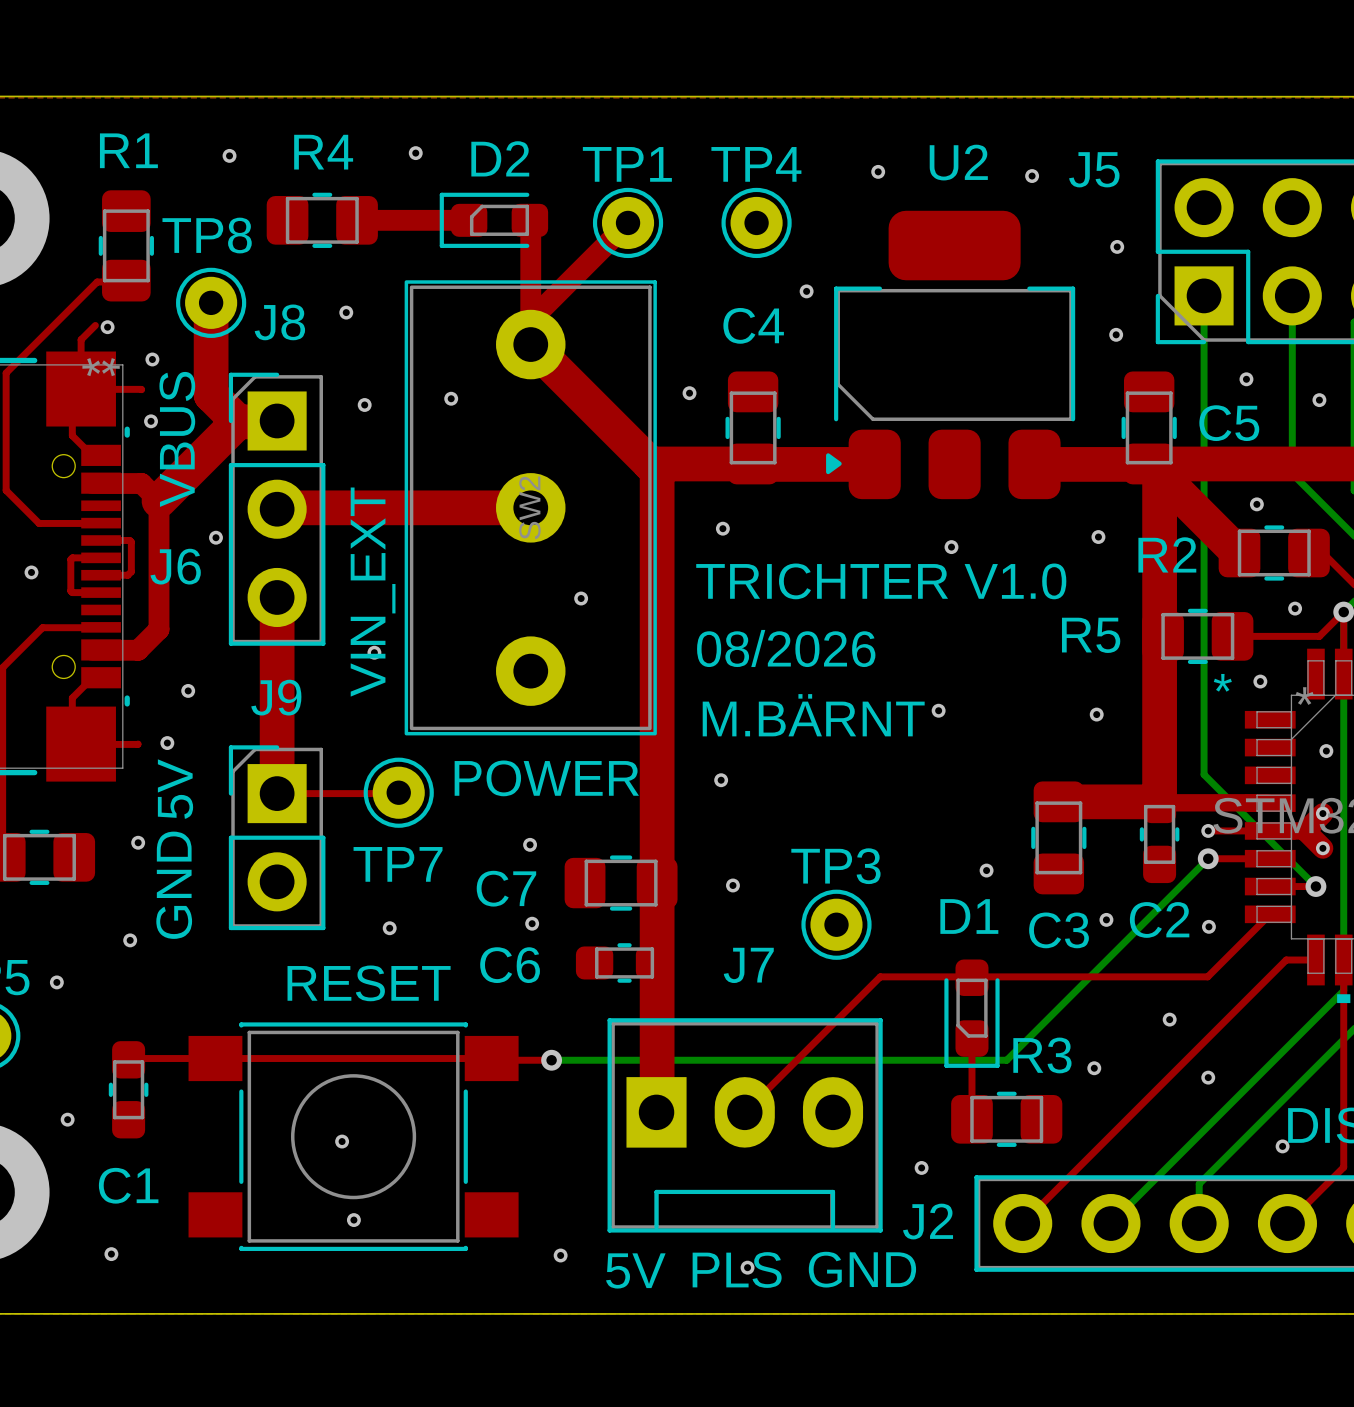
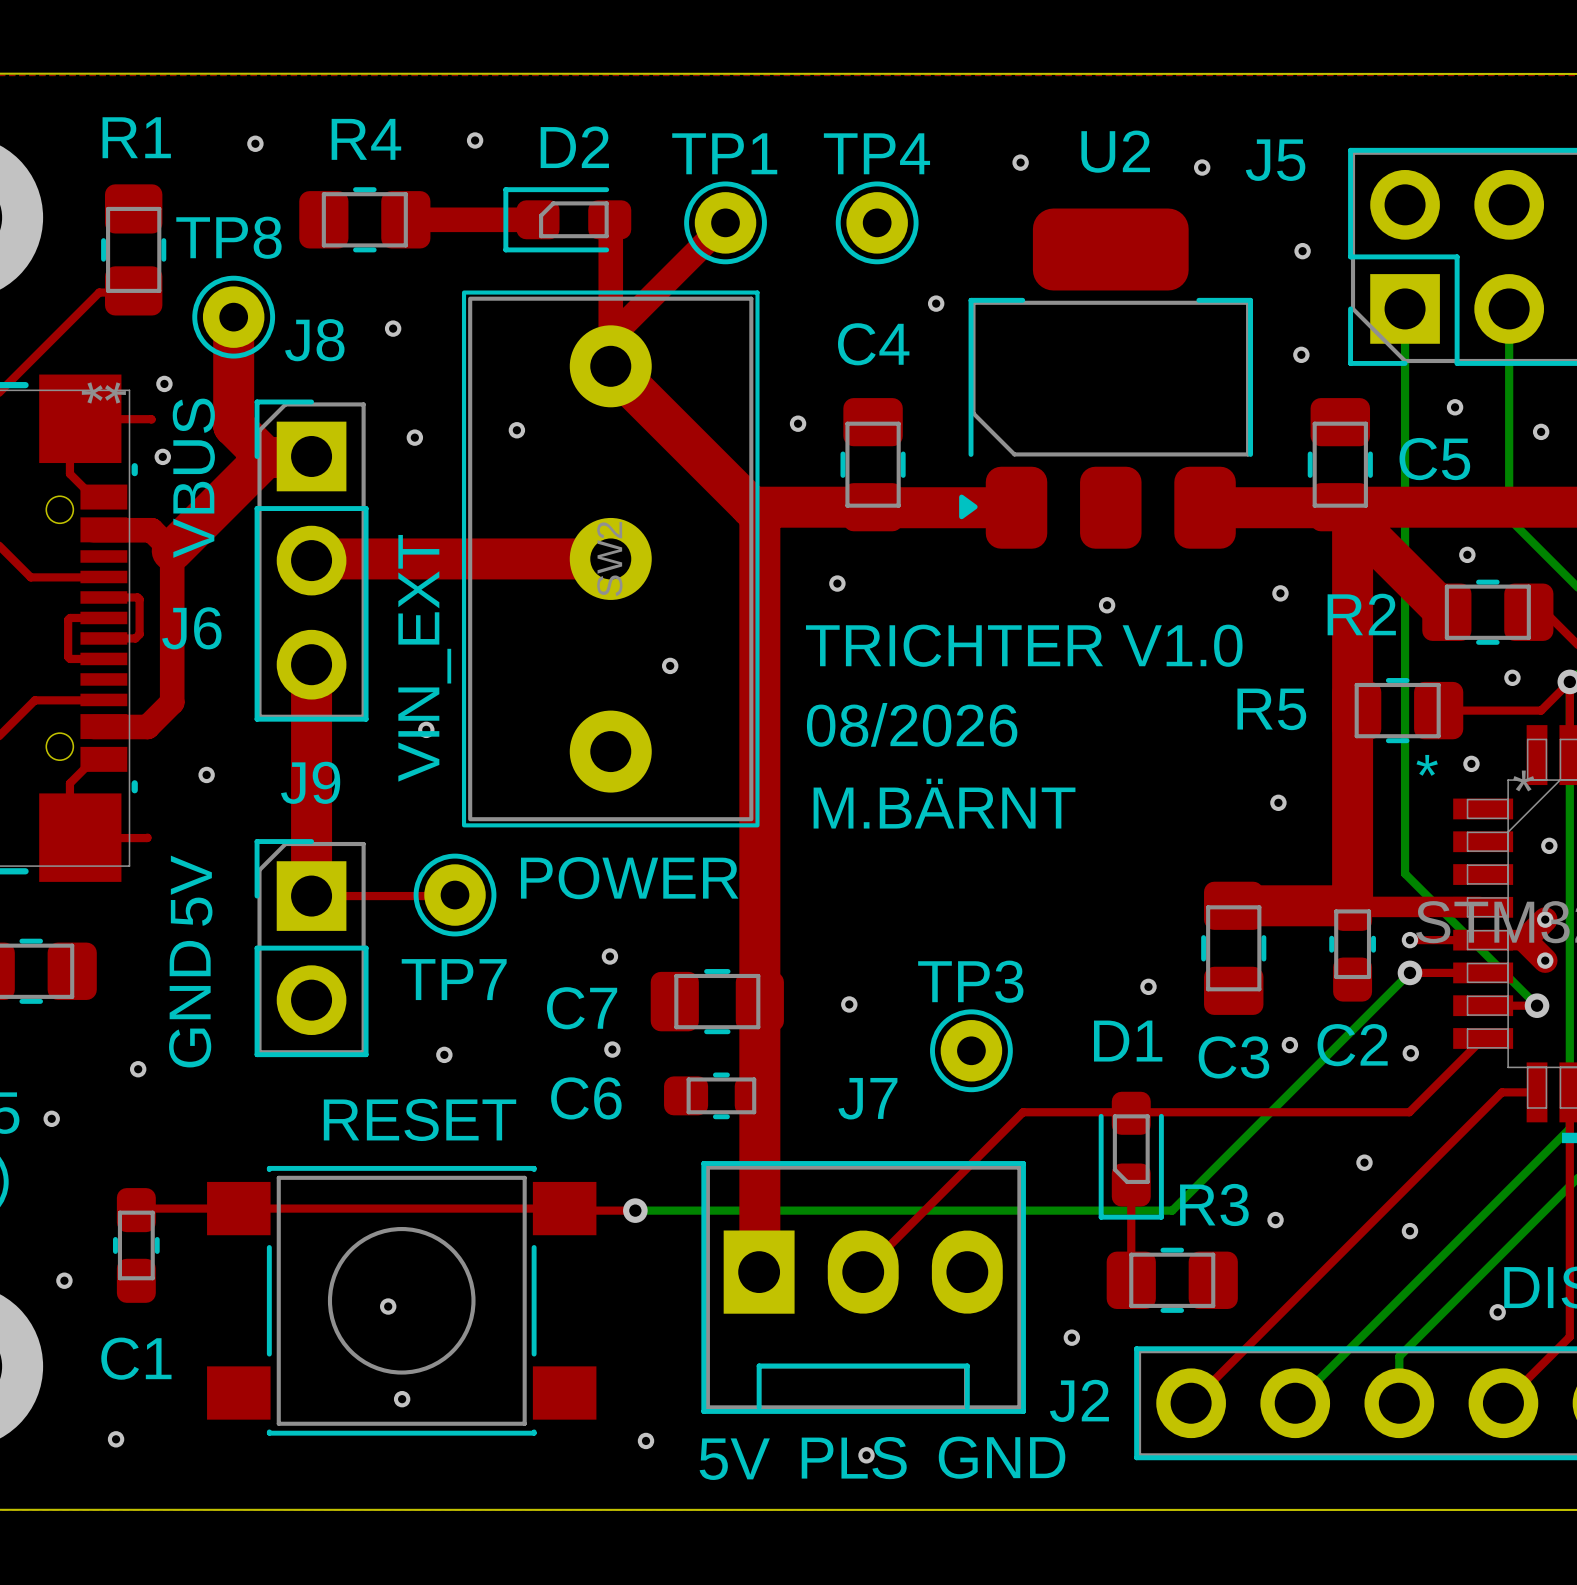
top track: (95, 325) (81, 339) (81, 389) -> none
via: (107, 327) -> none
via: (215, 537) -> none
via: (31, 572) -> none
via: (938, 710) -> none
via: (167, 743) -> none
via: (721, 780) -> none
via: (138, 842) -> none

